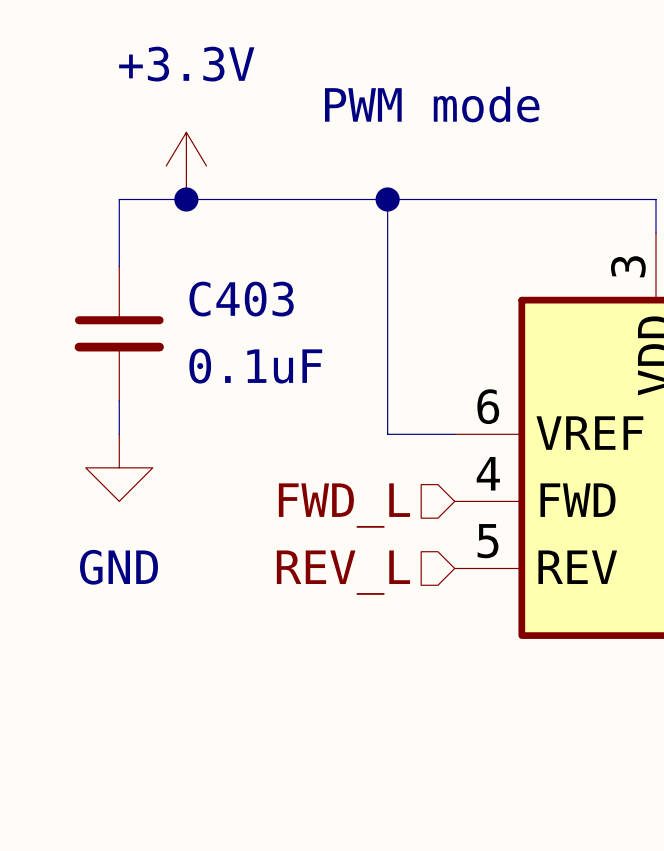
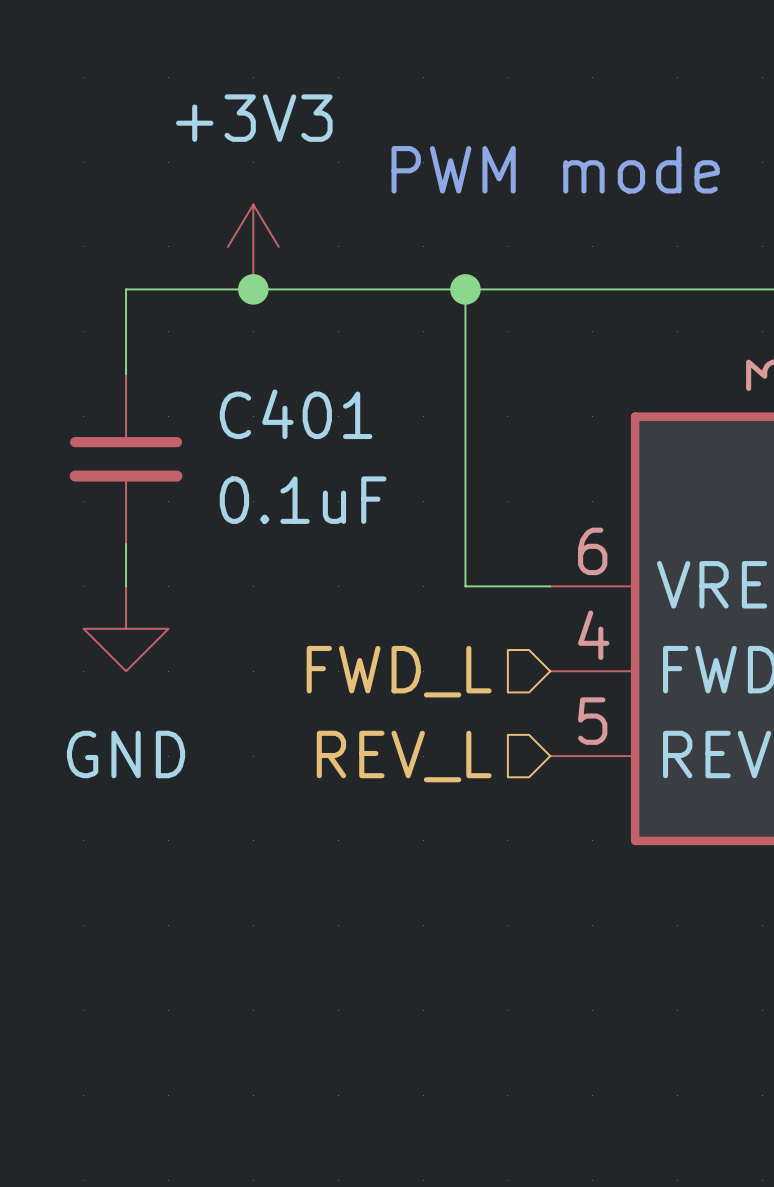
power symbol: +3.3V (186, 165) -> none
power symbol: none -> +3V3 (253, 246)
junction position: (186, 199) -> (253, 289)
C403 name: C403 (241, 299) -> C401 (296, 414)

